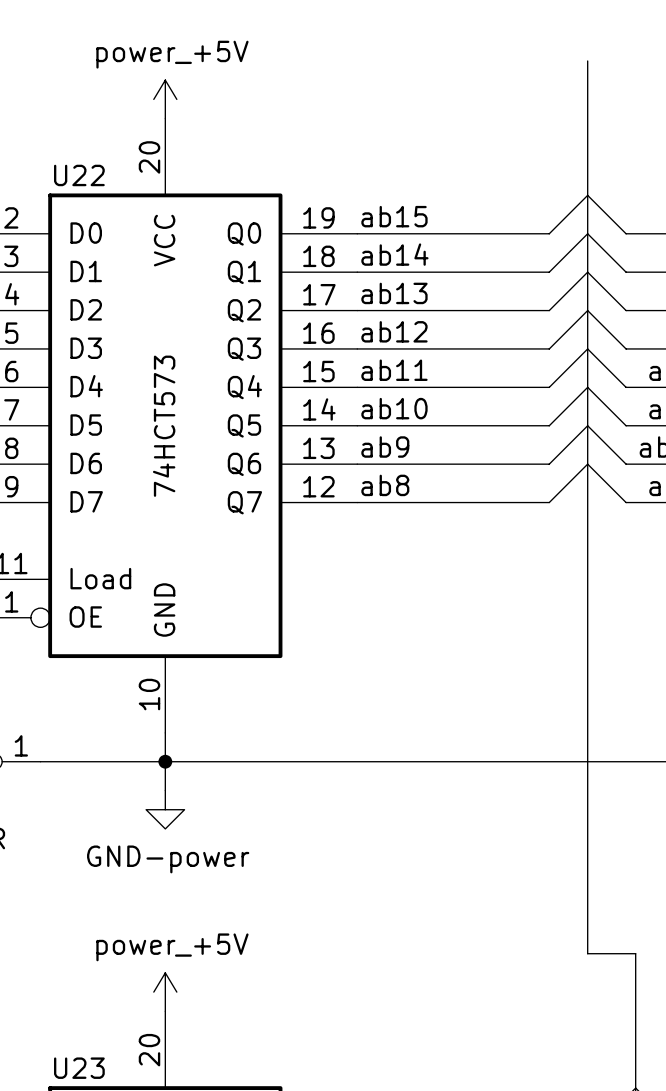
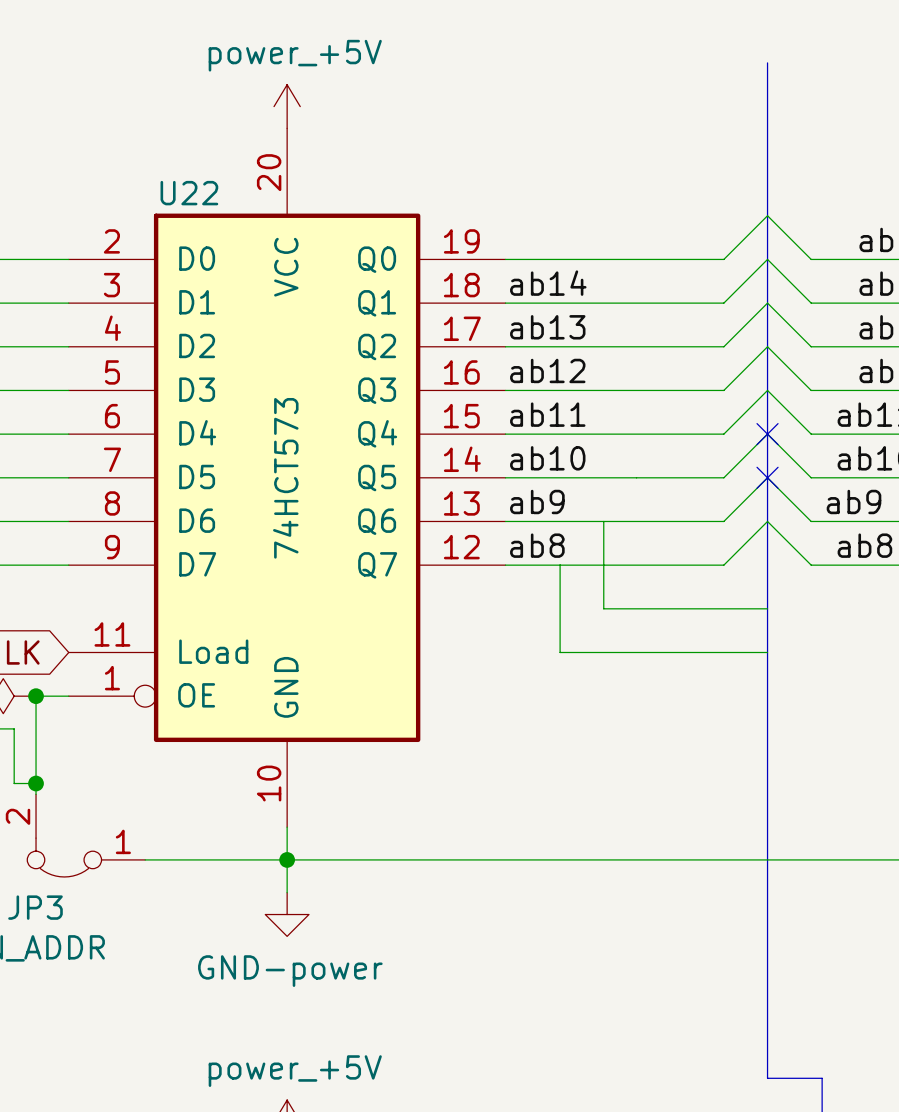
label: ab15 (394, 216) -> none
no-connect mark: none -> (767, 434)
no-connect mark: none -> (767, 477)
wire: none -> (603, 521) (603, 608) (767, 608)
wire: none -> (560, 565) (560, 652) (767, 652)

